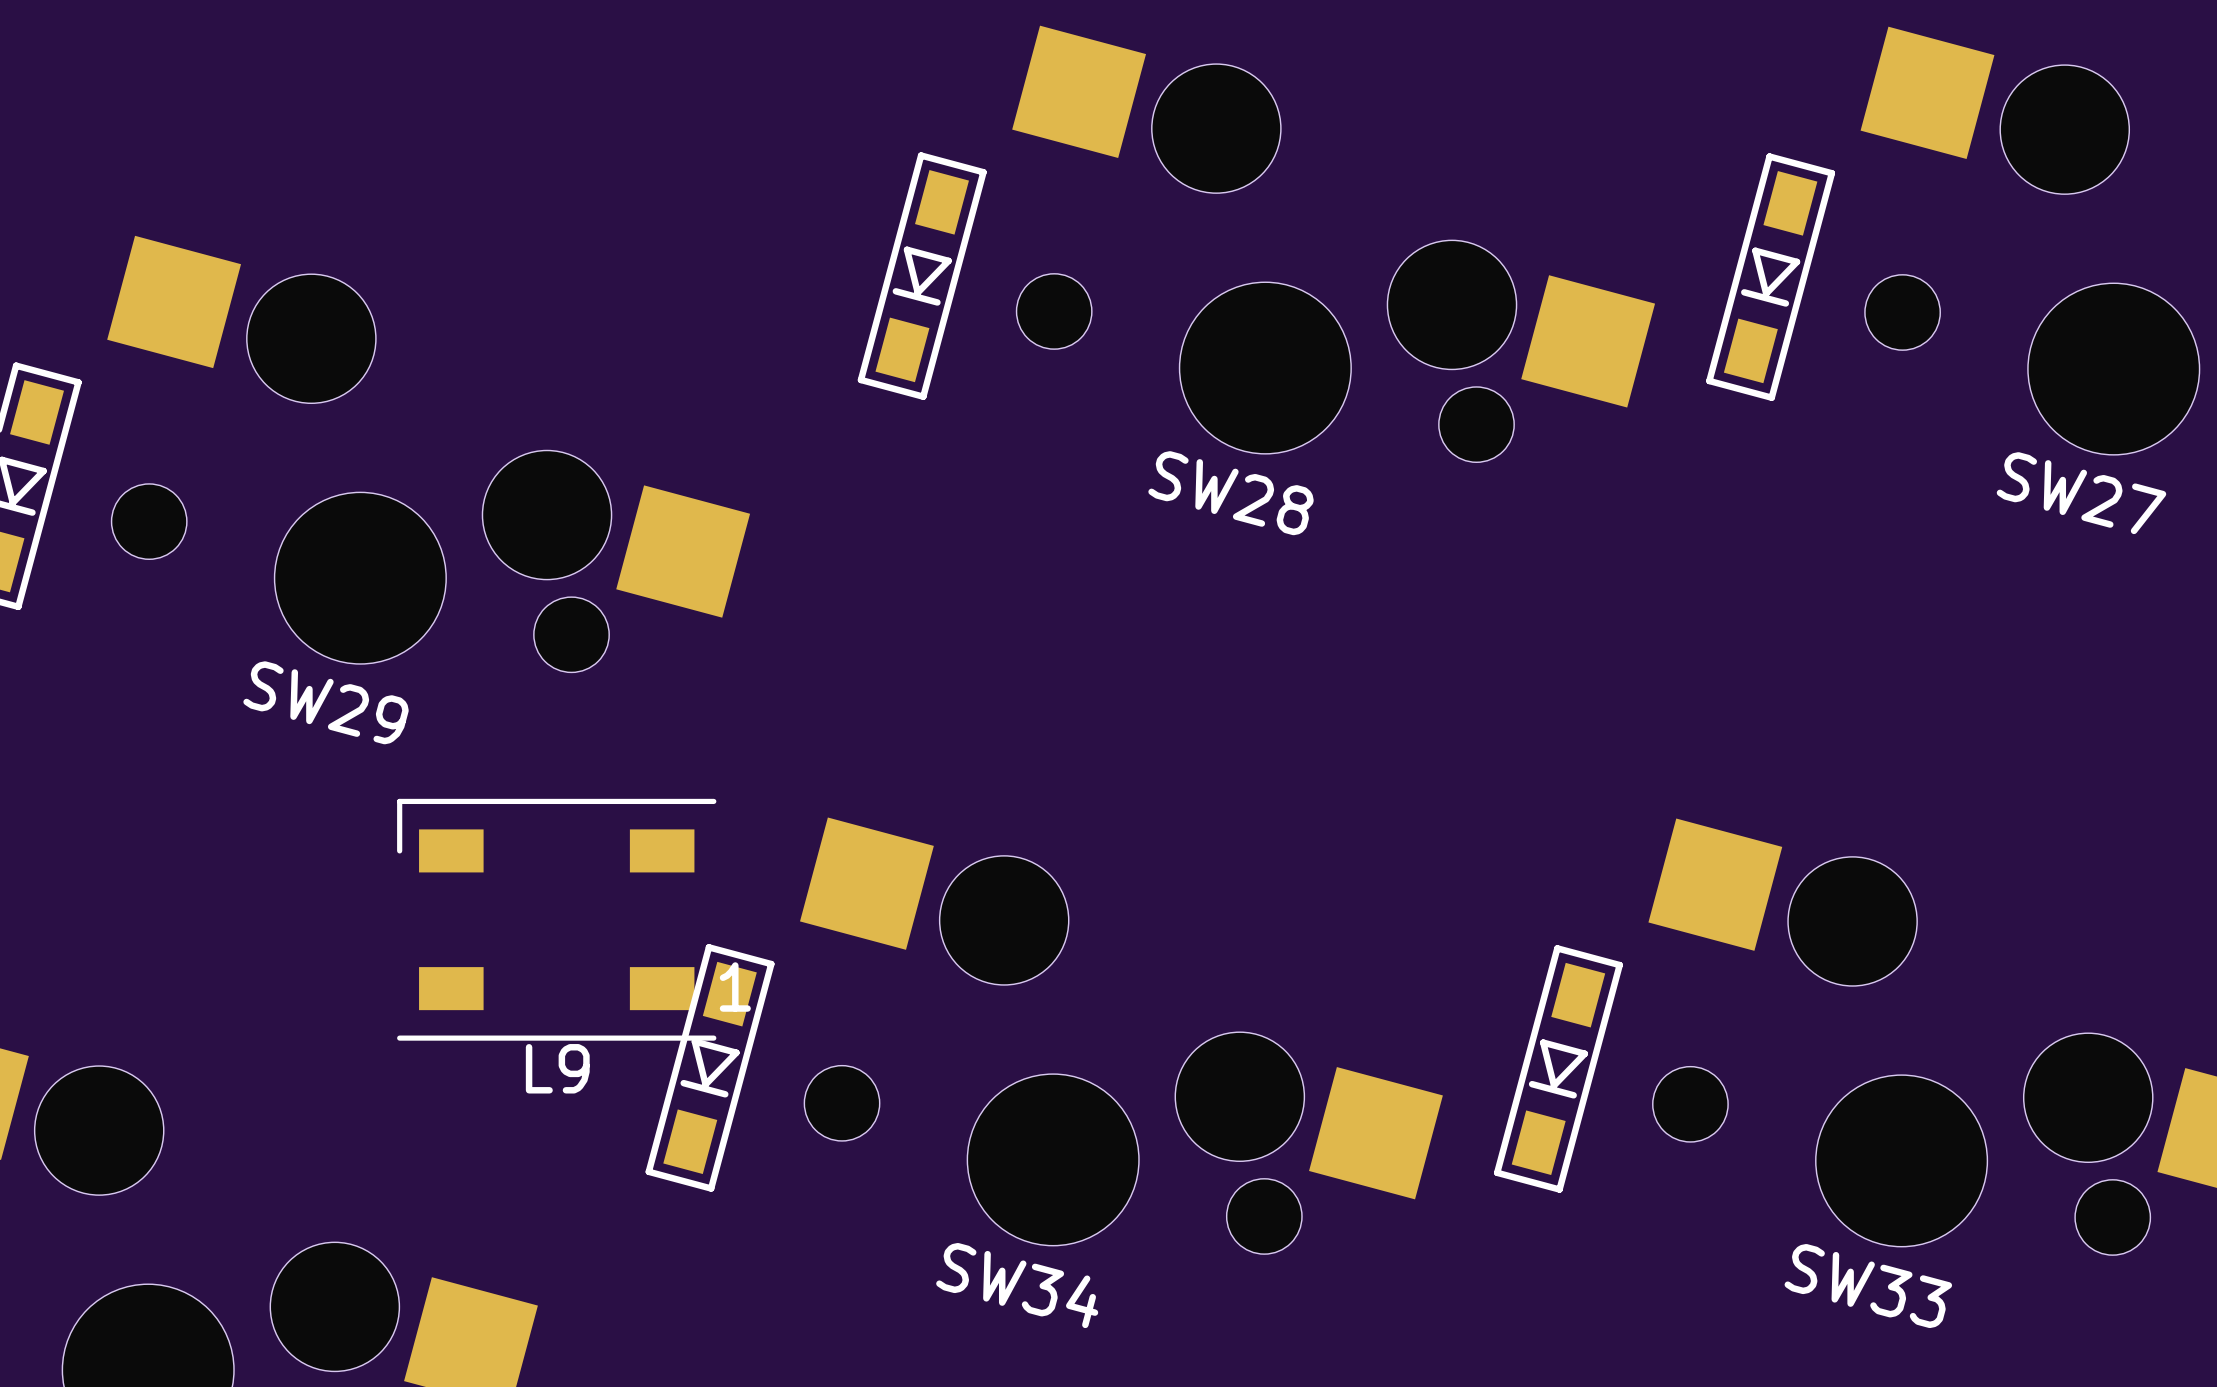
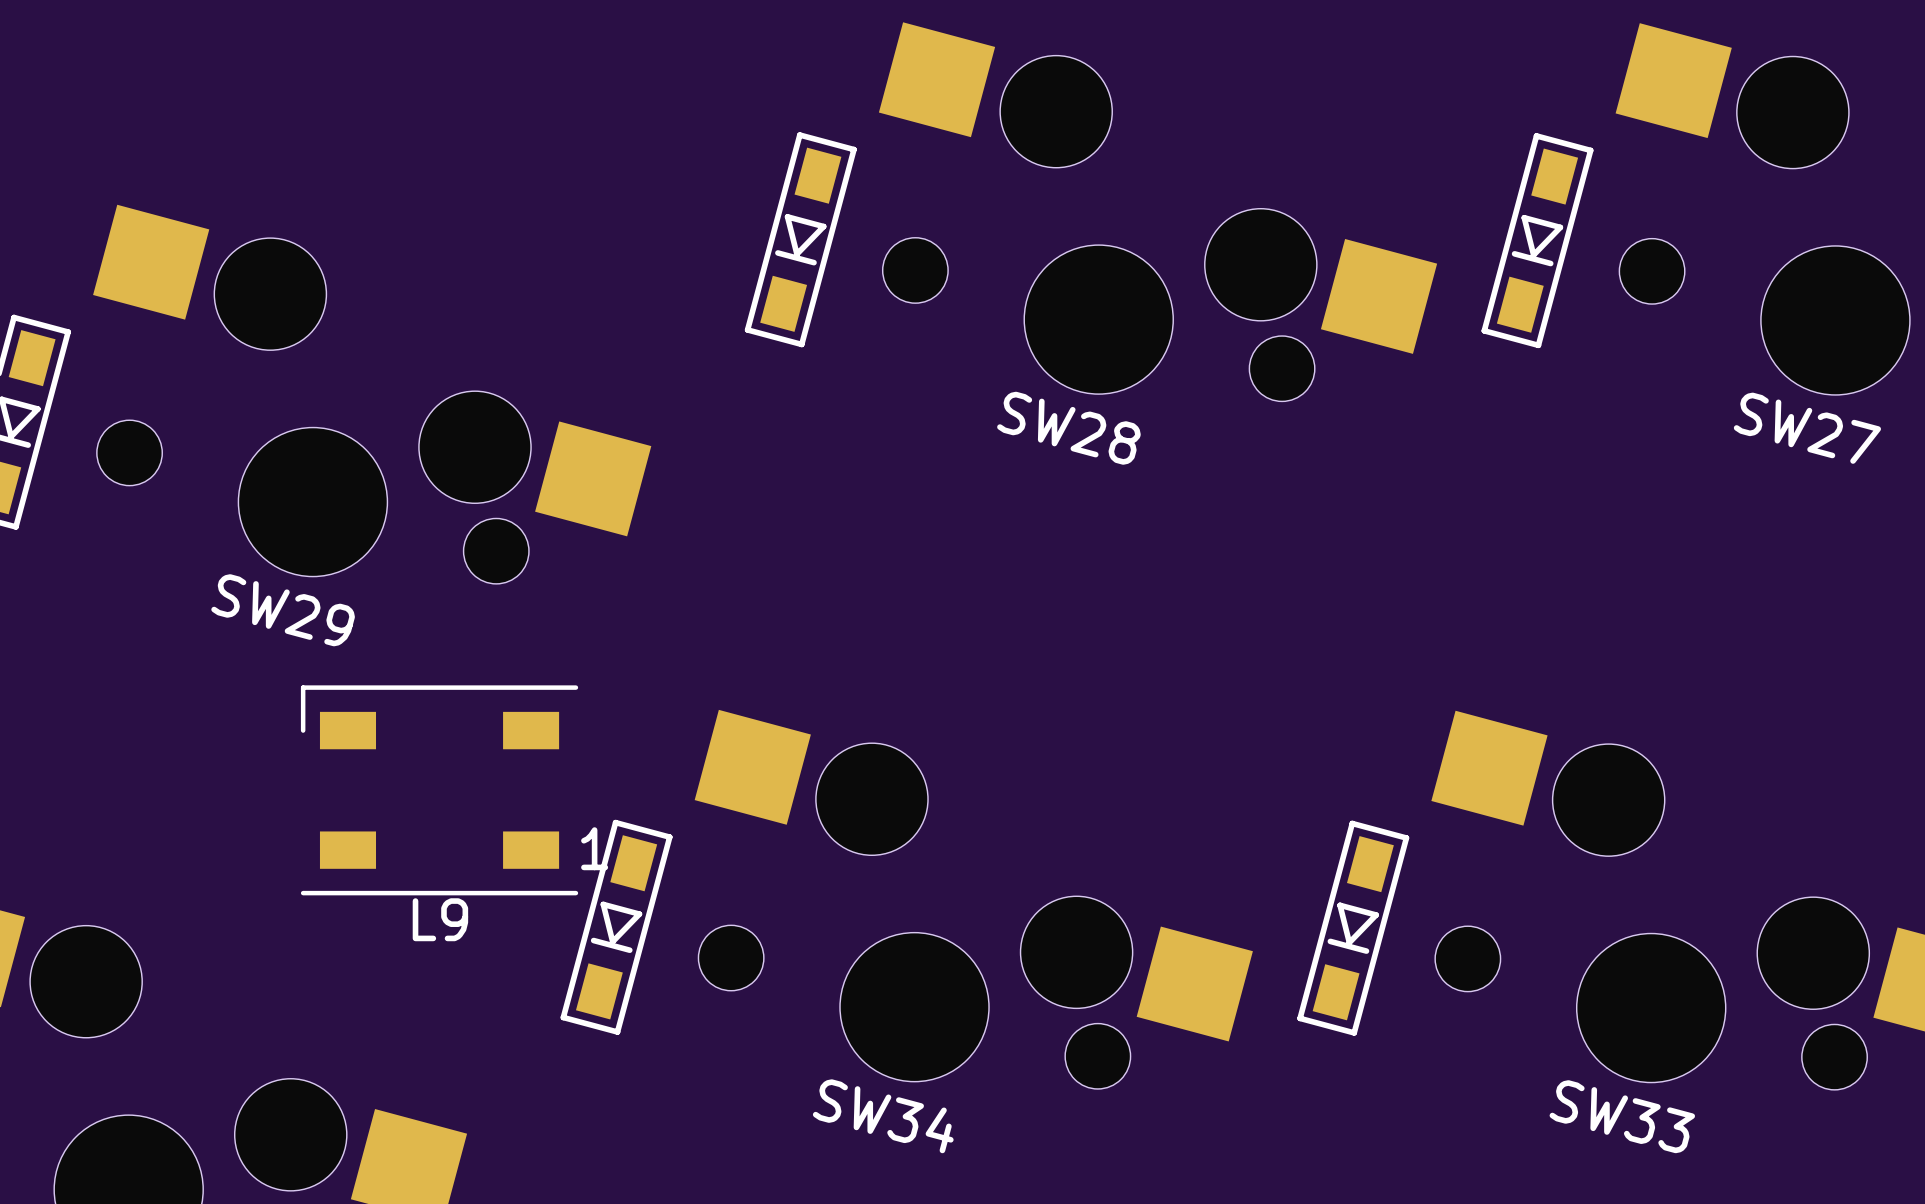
L9 position: (556, 919) -> (439, 790)

